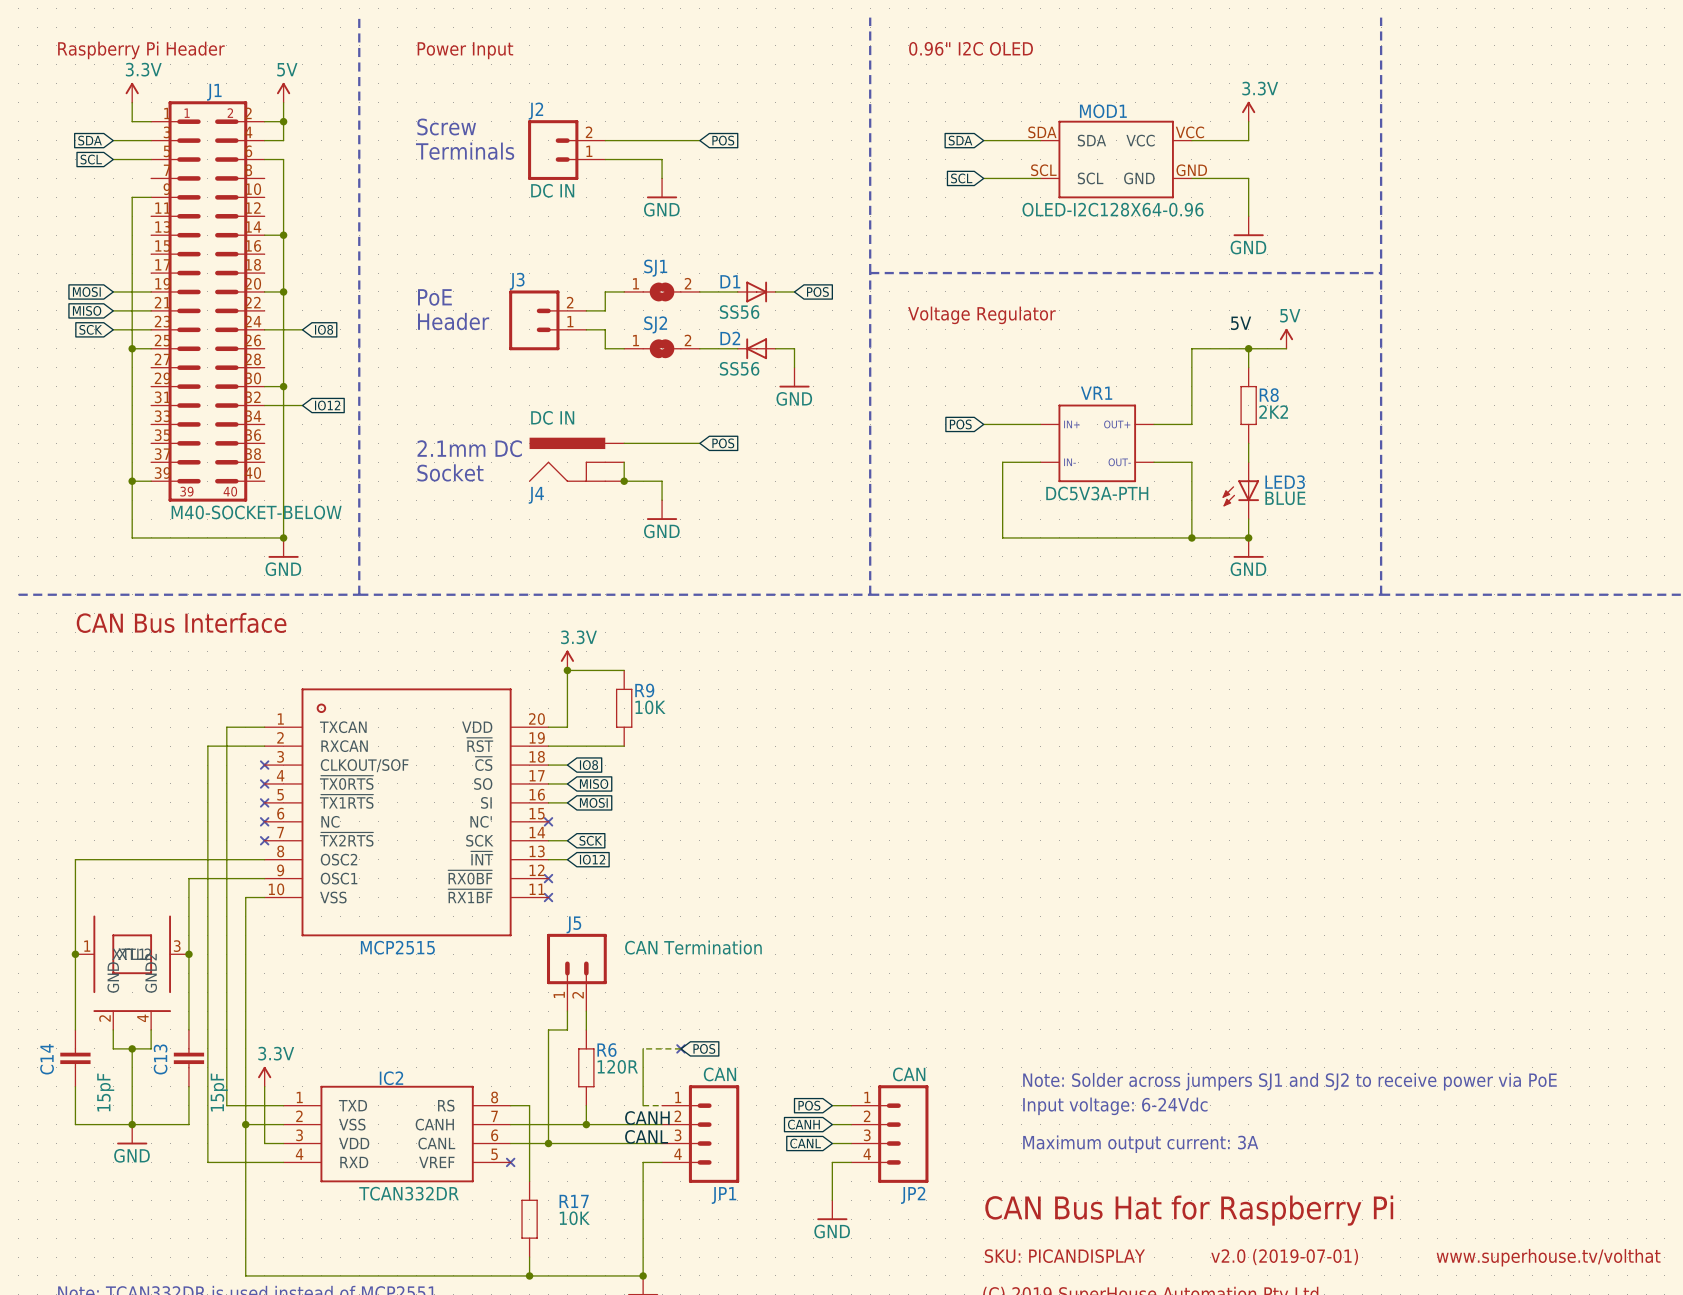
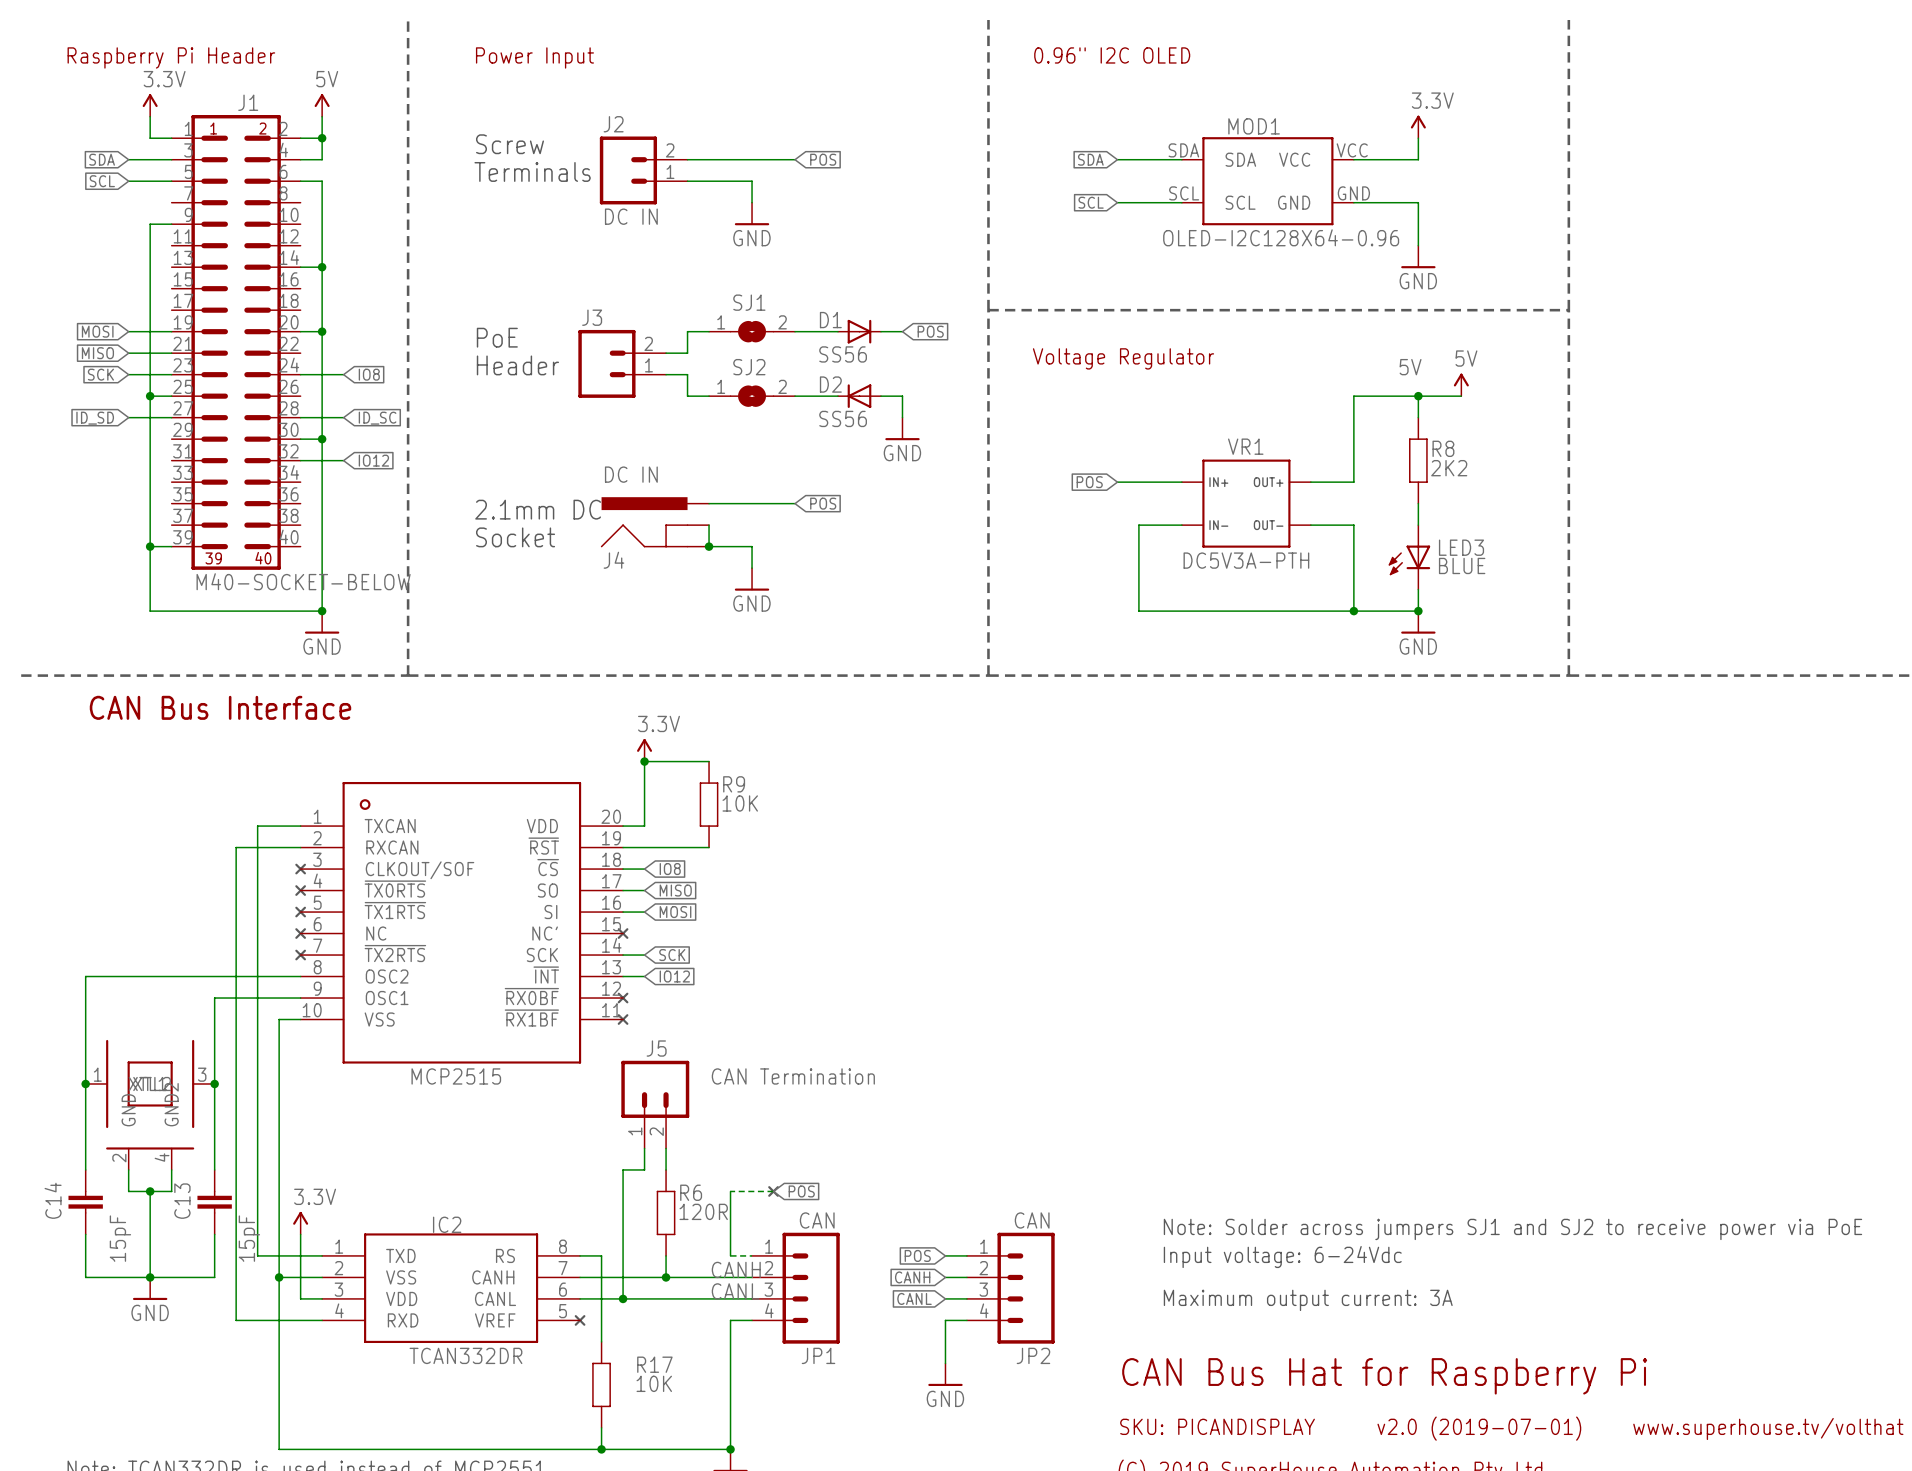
wire: none -> (128, 417) (171, 417)
wire: none -> (300, 417) (343, 417)
global label: none -> ID_SD (95, 418)
global label: none -> ID_SC (377, 418)

